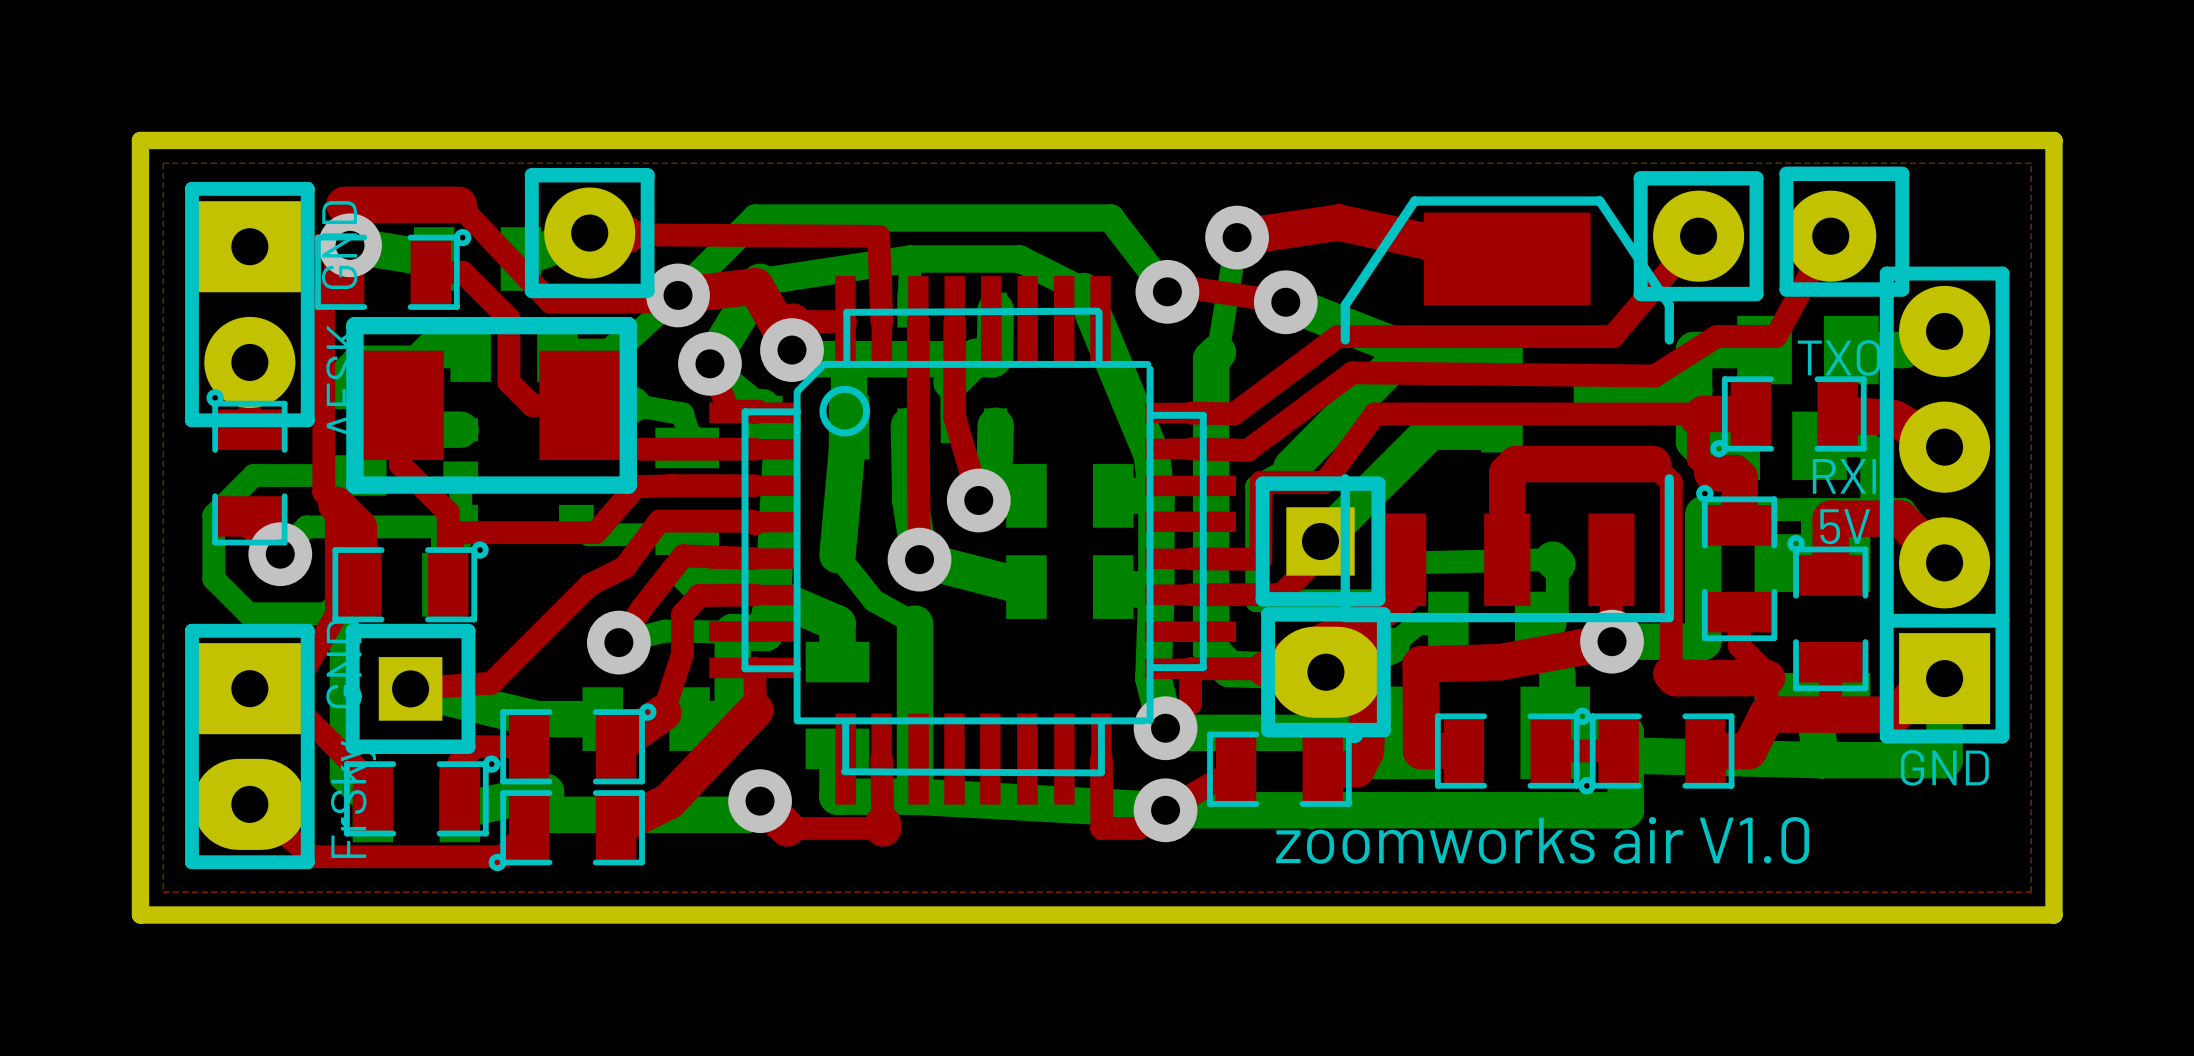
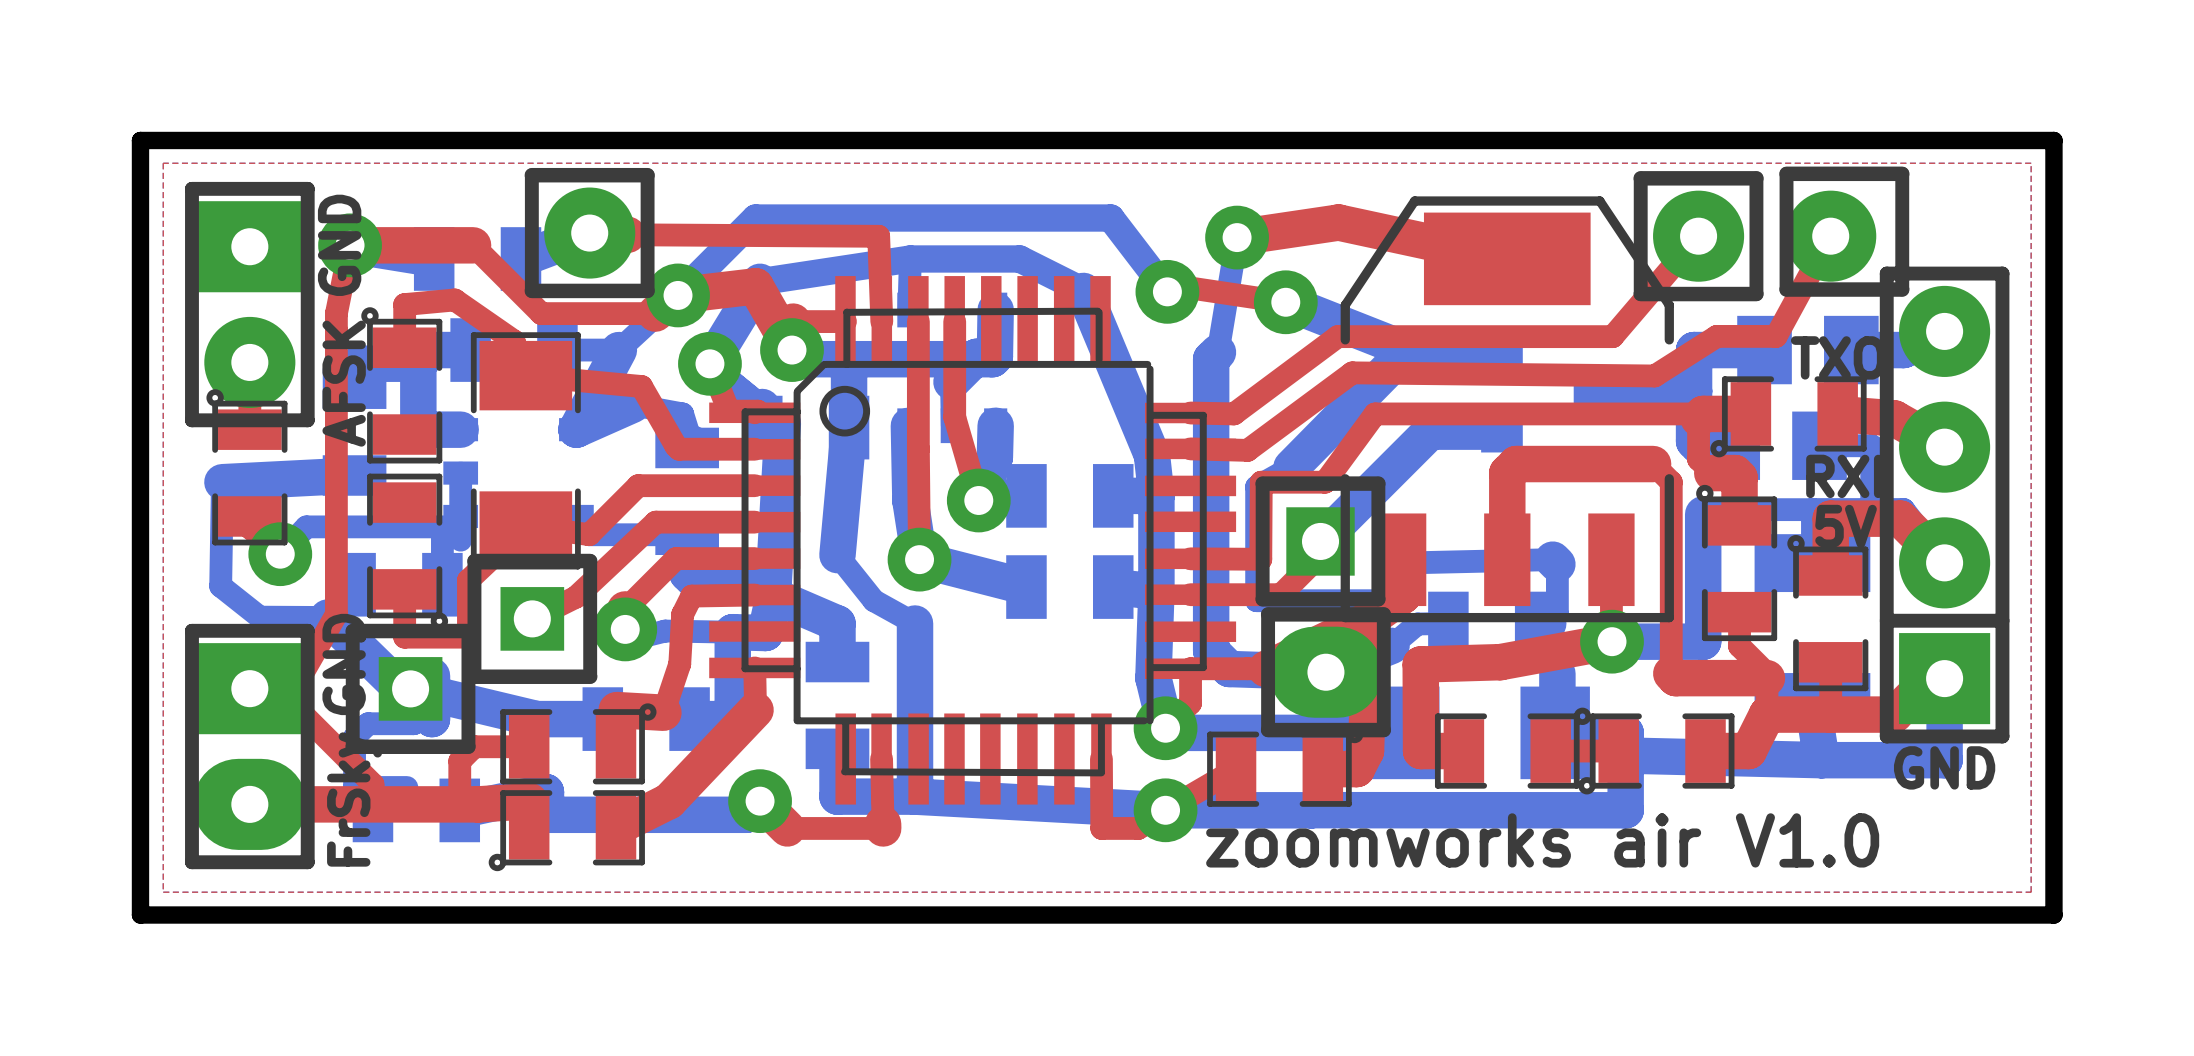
top track: (344, 204) (458, 204) (550, 302) (668, 302) (687, 286) -> (336, 504) (336, 313) (350, 245) (473, 245) (541, 313) (655, 313) (687, 286)
top track: (249, 246) (350, 245) (350, 269) (323, 295) (323, 492) (358, 526) (361, 584) -> none
part rotation: 0° (393, 269) -> 90° counterclockwise (401, 385)
part position: (393, 269) -> (401, 385)
top track: (430, 272) (462, 272) (508, 318) (508, 382) (532, 405) (582, 405) (626, 449) (679, 449) -> (404, 347) (404, 304) (454, 299) (514, 341) (525, 375) (641, 386) (679, 449)
top track: (400, 405) (400, 464) (448, 512) (448, 584) (453, 532) (595, 532) (636, 486) (671, 485) -> (404, 589) (404, 637) (468, 637) (468, 580) (525, 526) (589, 534) (638, 485) (671, 485)
part: (491, 405) -> none
part: none -> (525, 450)
bottom track: (354, 475) (253, 475) (213, 515) (213, 578) (248, 613) (326, 613) (355, 584) (355, 593) (341, 607) (341, 778) (372, 810) -> (354, 475) (222, 482) (220, 586) (259, 617) (327, 617) (431, 719) (431, 675) (431, 705) (413, 723) (368, 723) (354, 737) (354, 787) (406, 787)
top track: (754, 522) (754, 523) (751, 521) (659, 521) (624, 567) (589, 584) (491, 683) (410, 688) -> (754, 522) (655, 522) (575, 597) (532, 618)
top track: (754, 558) (683, 555) (642, 607) (618, 642) -> (754, 558) (676, 558) (625, 609) (625, 629)
part rotation: 0° (410, 581) -> 90° clockwise (407, 551)
top track: (754, 595) (699, 595) (682, 614) (682, 654) (663, 712) (615, 746) -> (754, 595) (691, 596) (682, 614) (679, 664) (663, 712) (616, 710)
part: none -> (532, 618)
via position: (618, 642) -> (625, 629)
part: (422, 795) -> none
top track: (249, 804) (312, 856) (503, 856) (529, 827) -> (249, 804) (478, 804) (529, 801)

